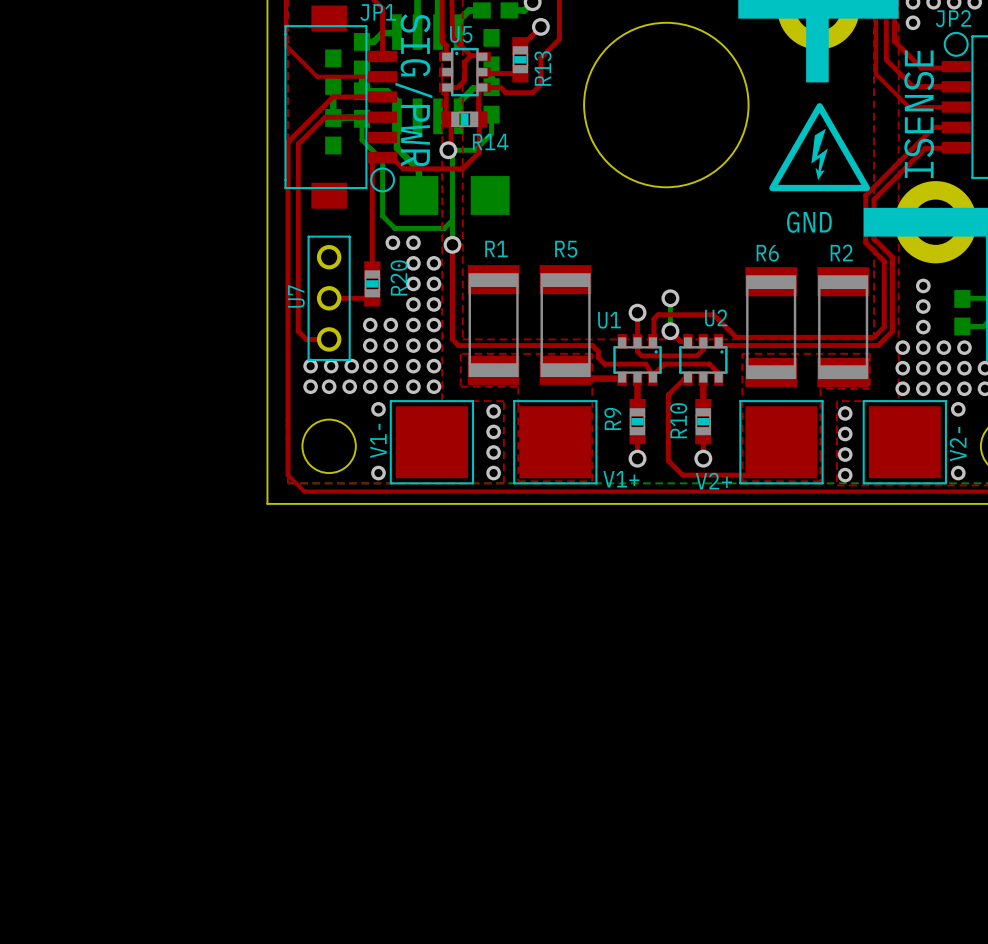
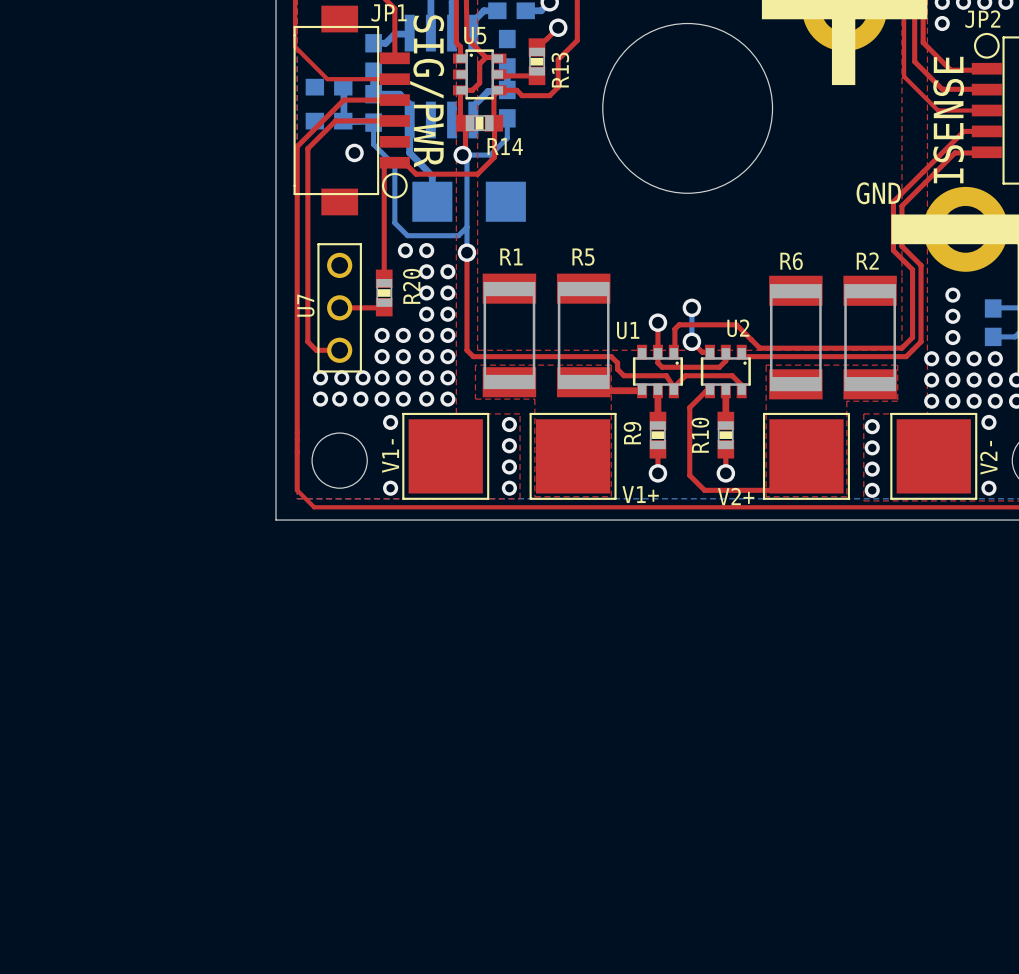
part rotation: 0° (333, 72) -> 90° clockwise (329, 87)
drawing: [769, 103, 871, 192] -> none
part rotation: 0° (333, 131) -> 90° clockwise (329, 121)
via: none -> (354, 152)
GND name position: GND (809, 222) -> GND (878, 193)

